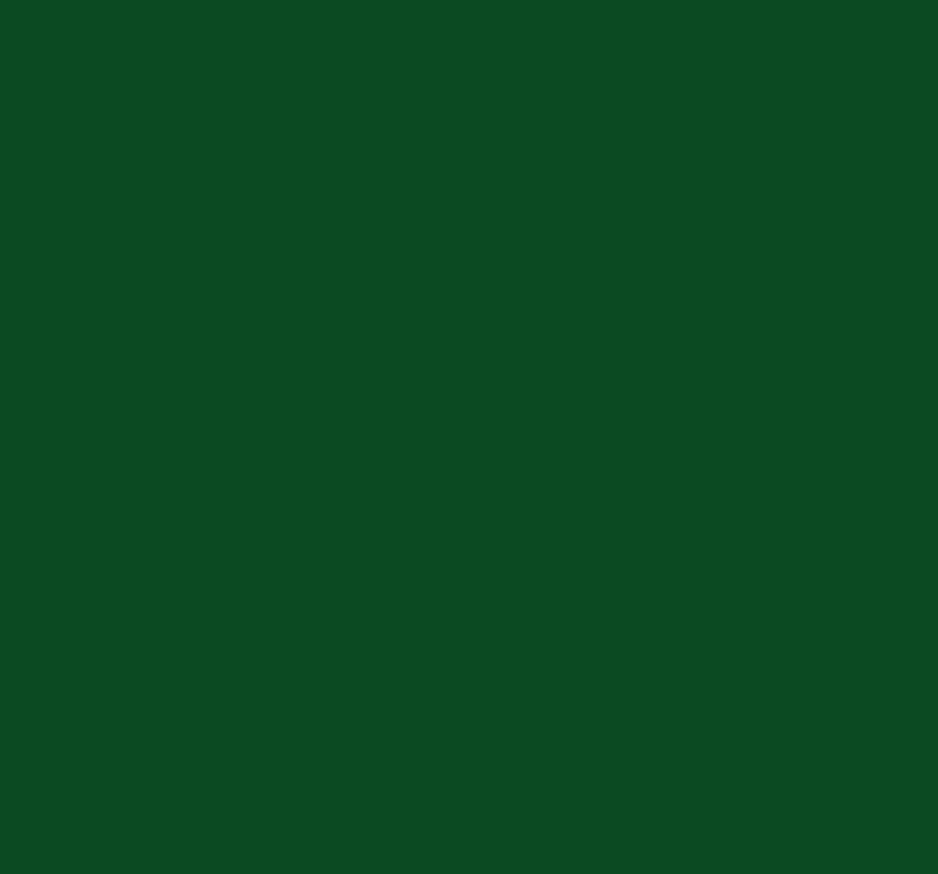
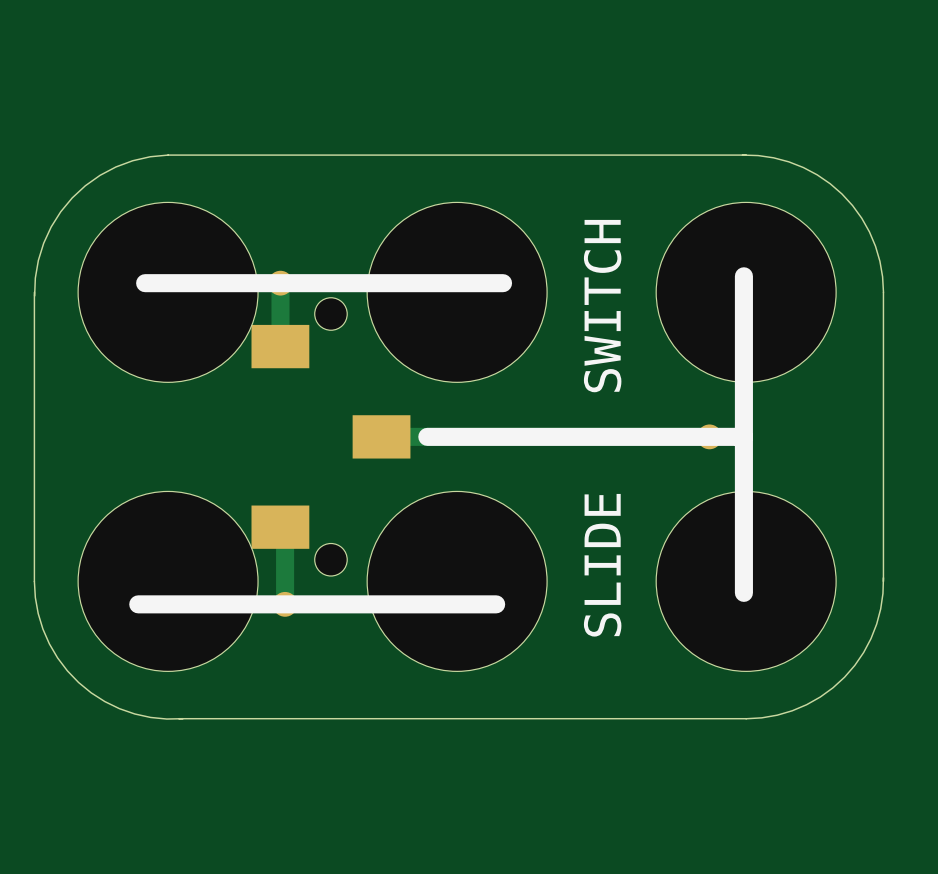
part: none -> (458, 437)

